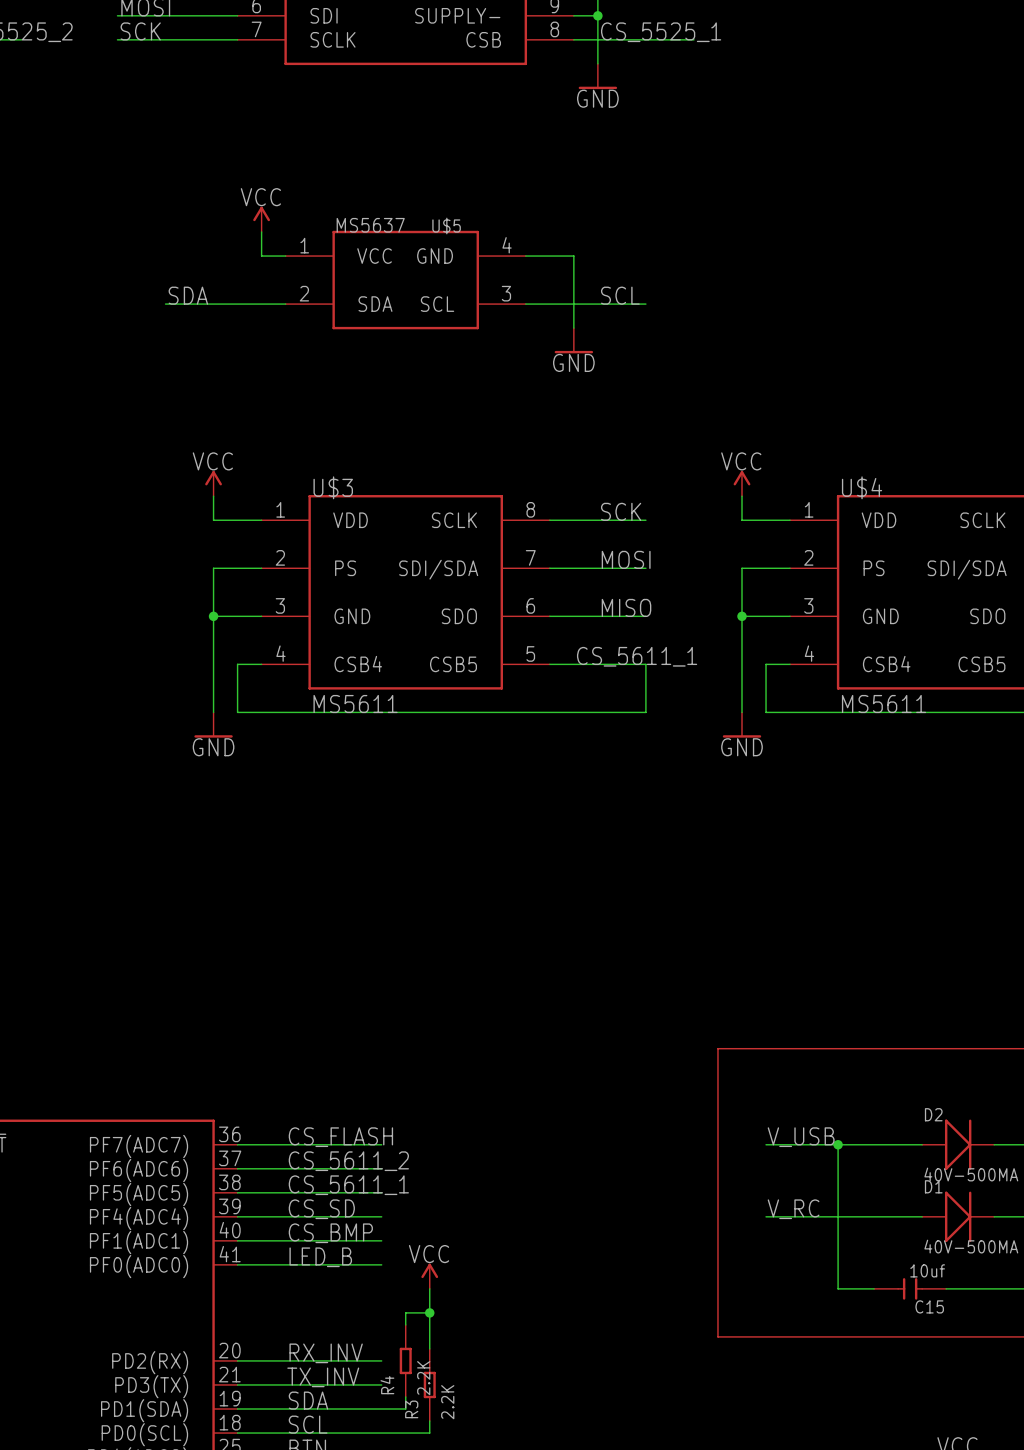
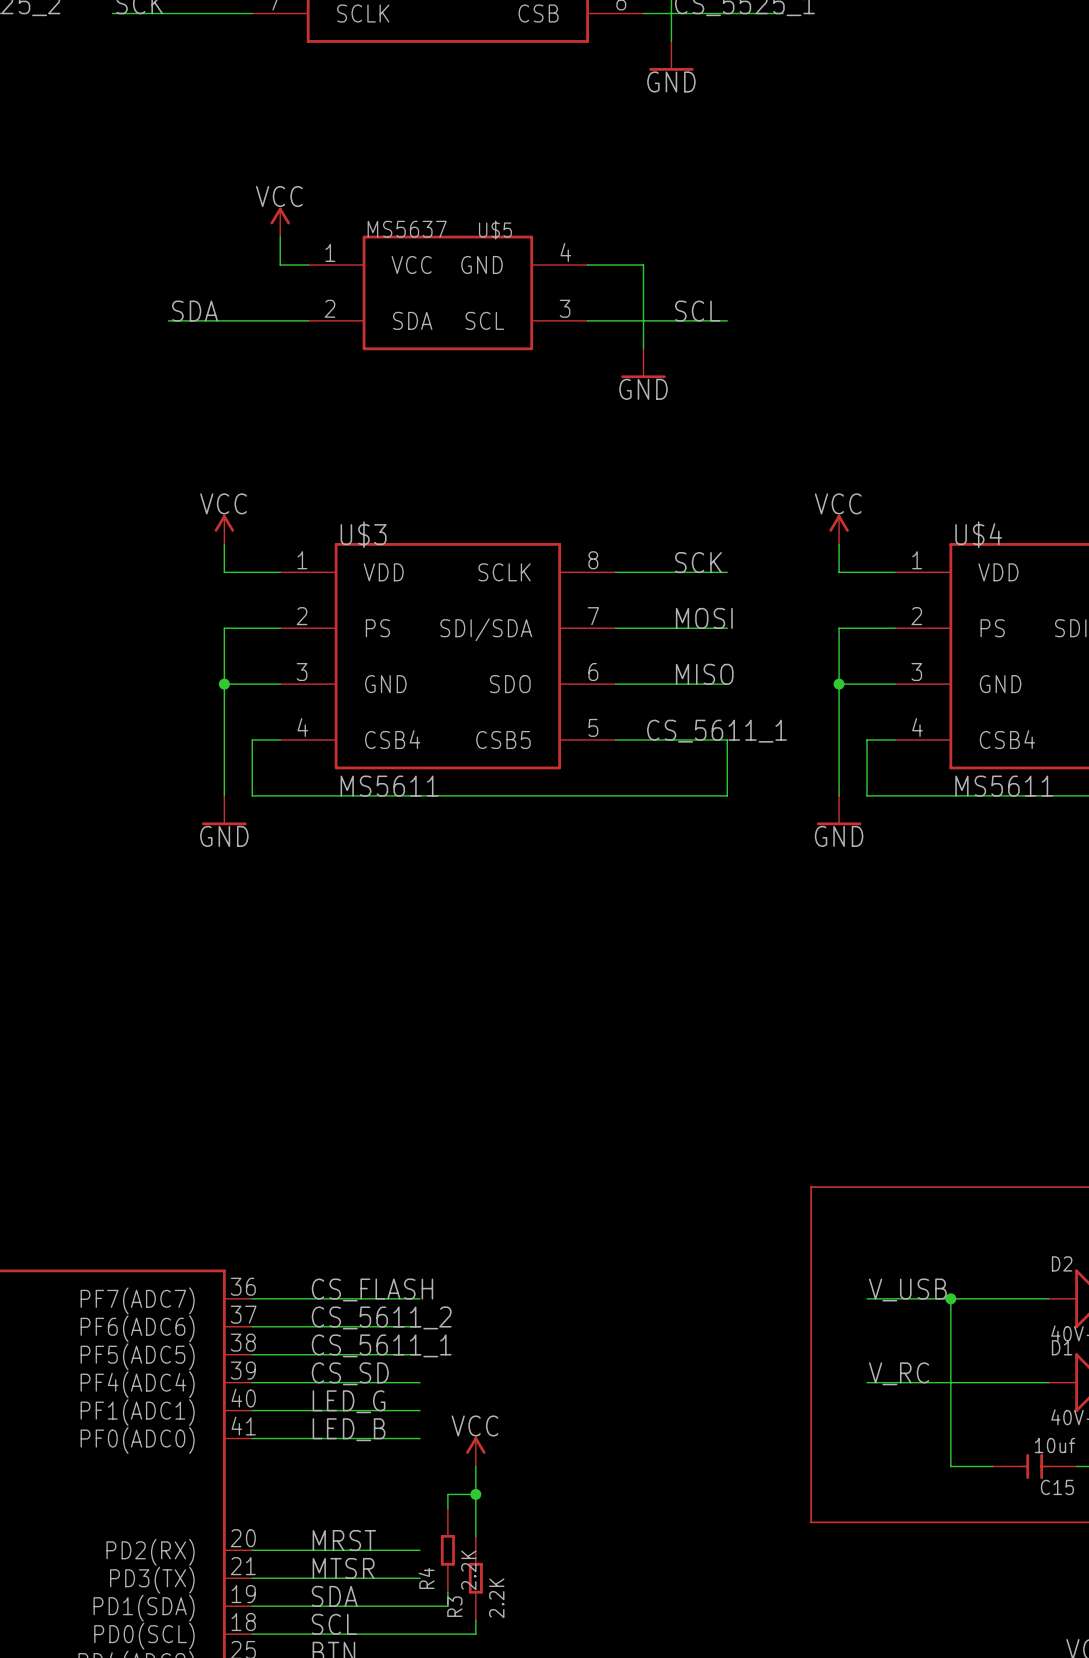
label: CS_BMP (330, 1233) -> LED_G (349, 1401)
label: RX_INV (326, 1353) -> MRST (344, 1540)
label: TX_INV (323, 1377) -> MTSR (343, 1568)

